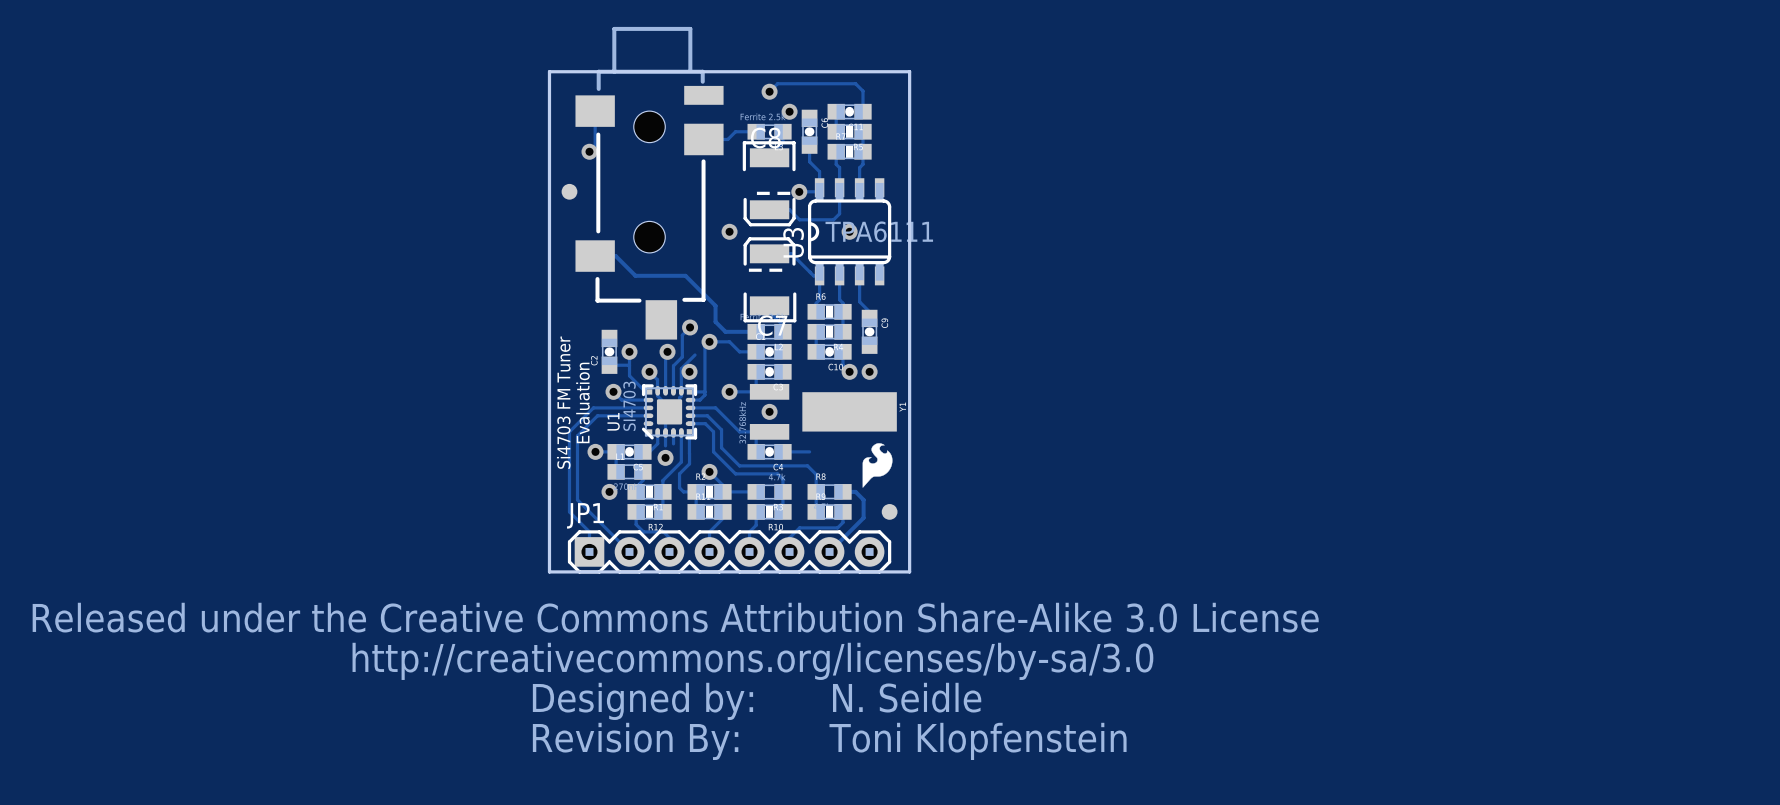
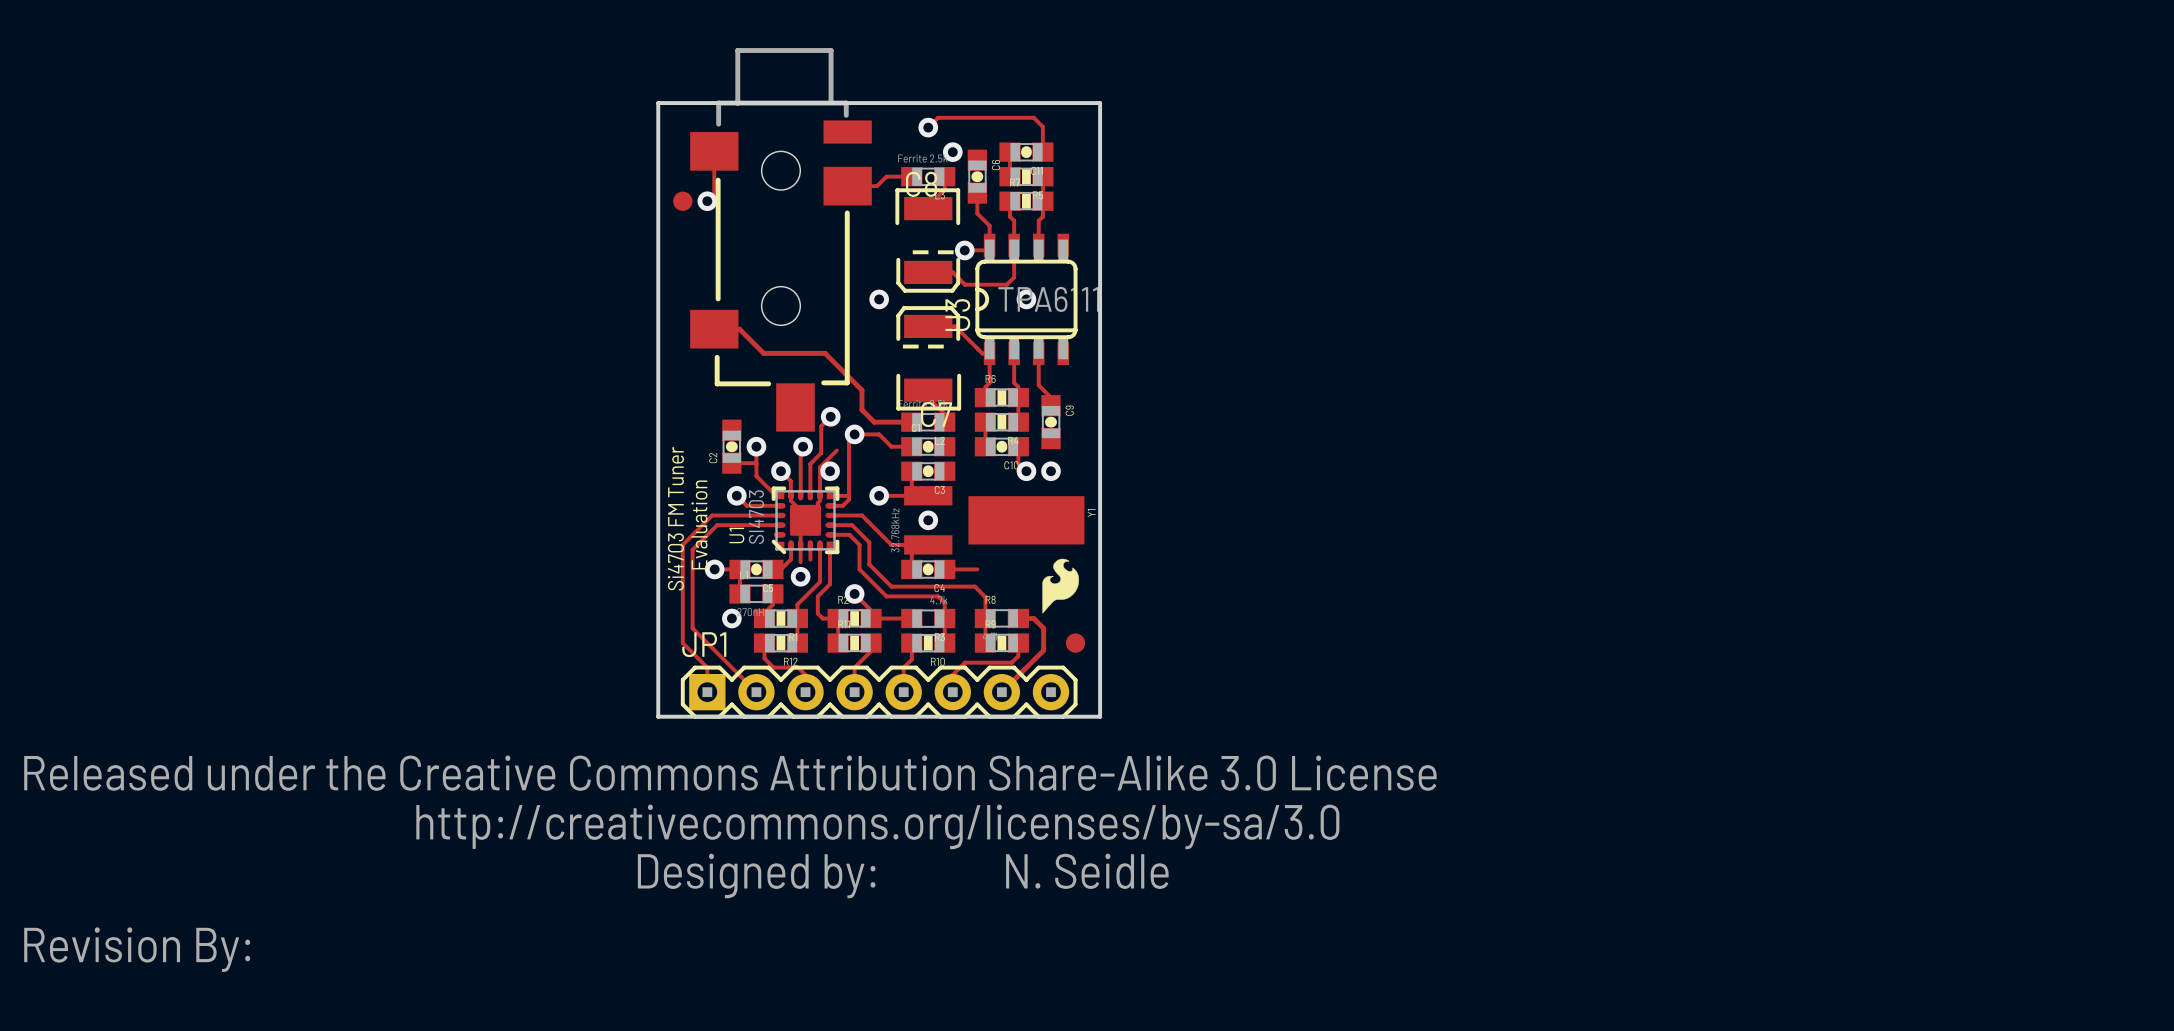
part position: (569, 191) -> (682, 201)
drawing: [532, 722, 739, 760] -> none
text: Toni Klopfenstein (978, 741) -> none
drawing: none -> [24, 927, 251, 972]

